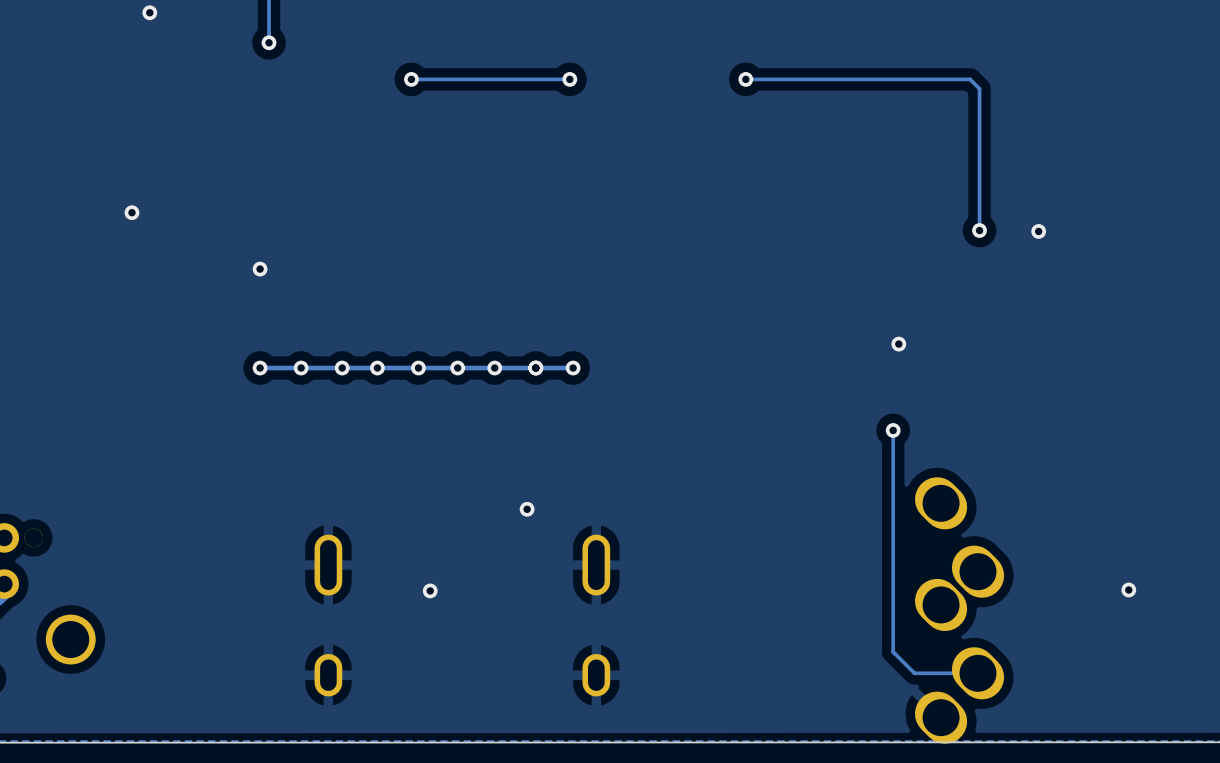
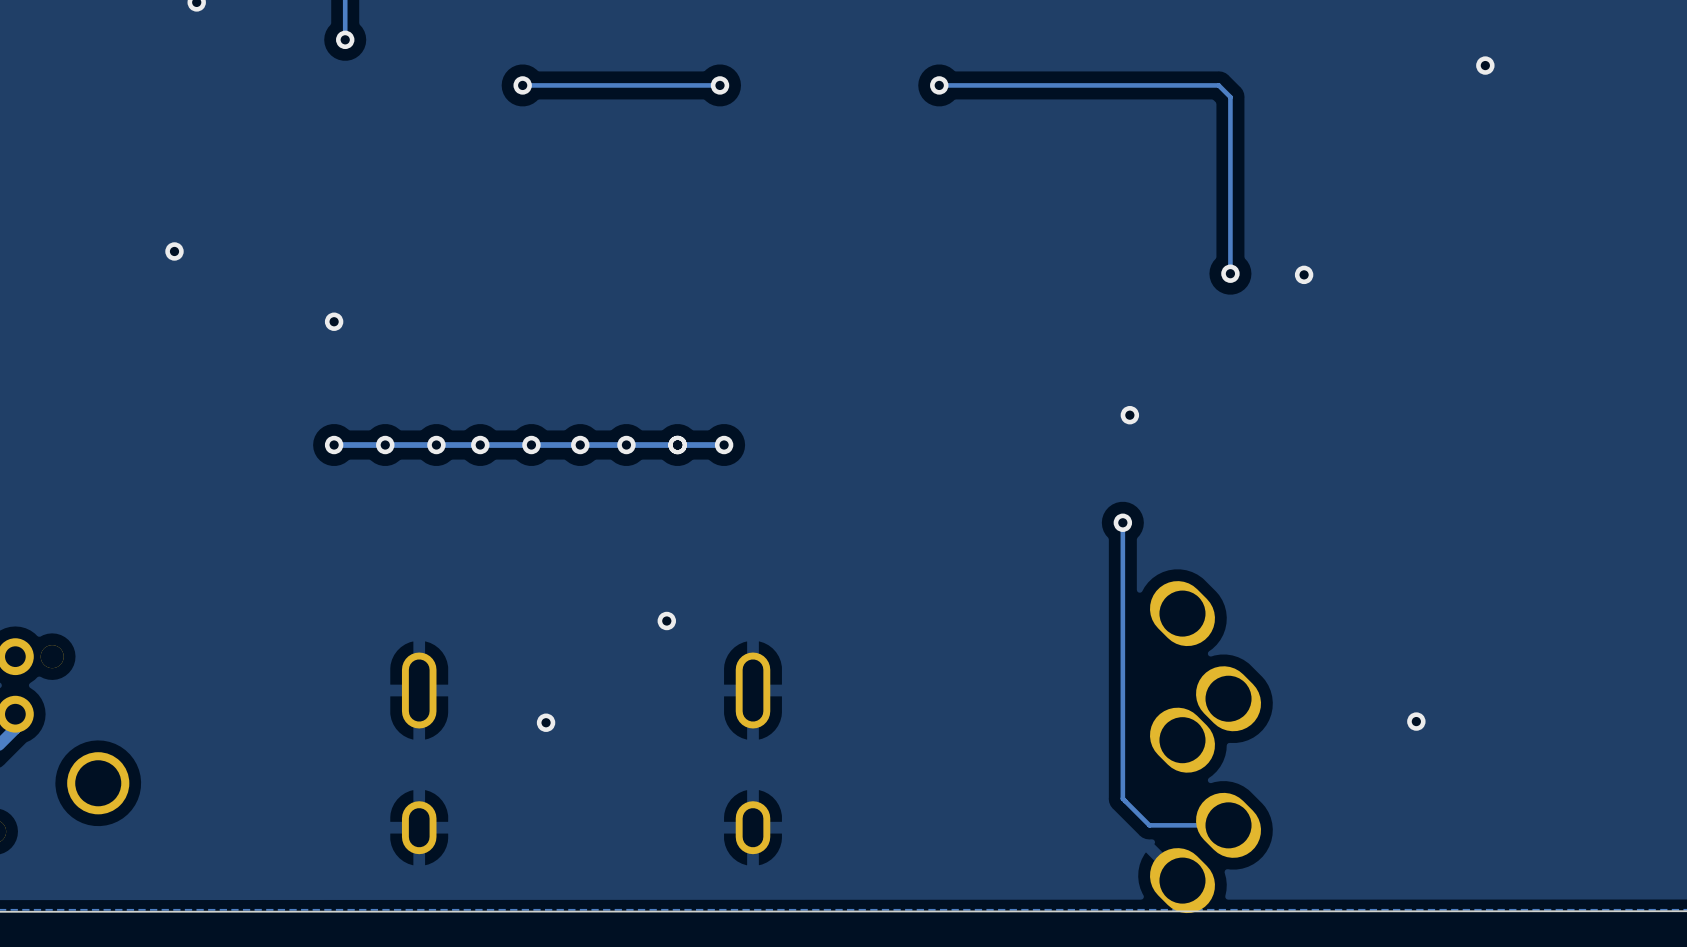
via: none -> (1485, 65)

